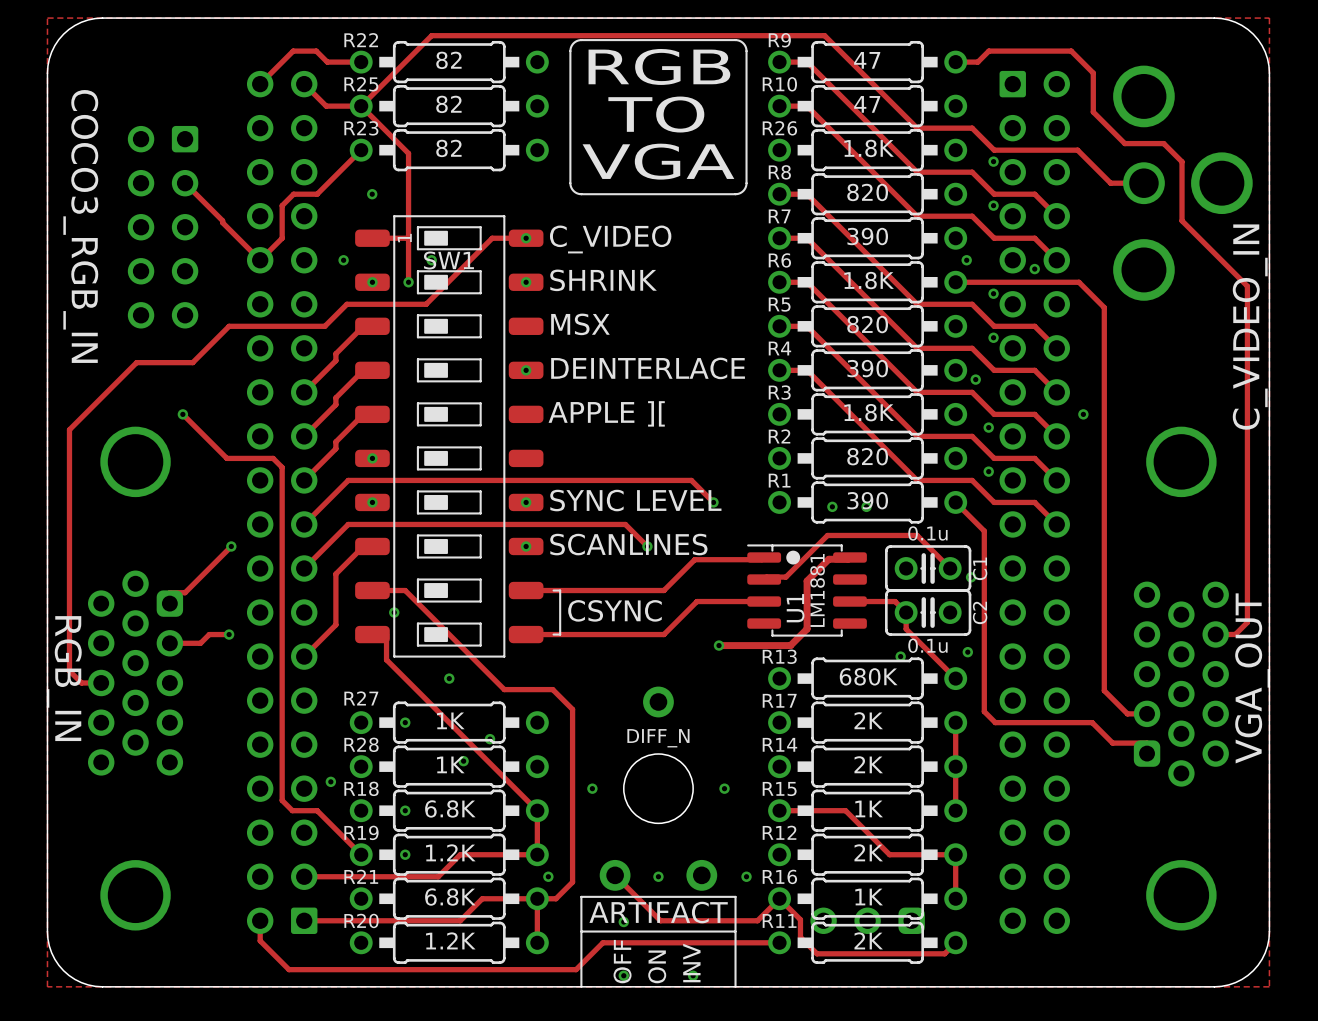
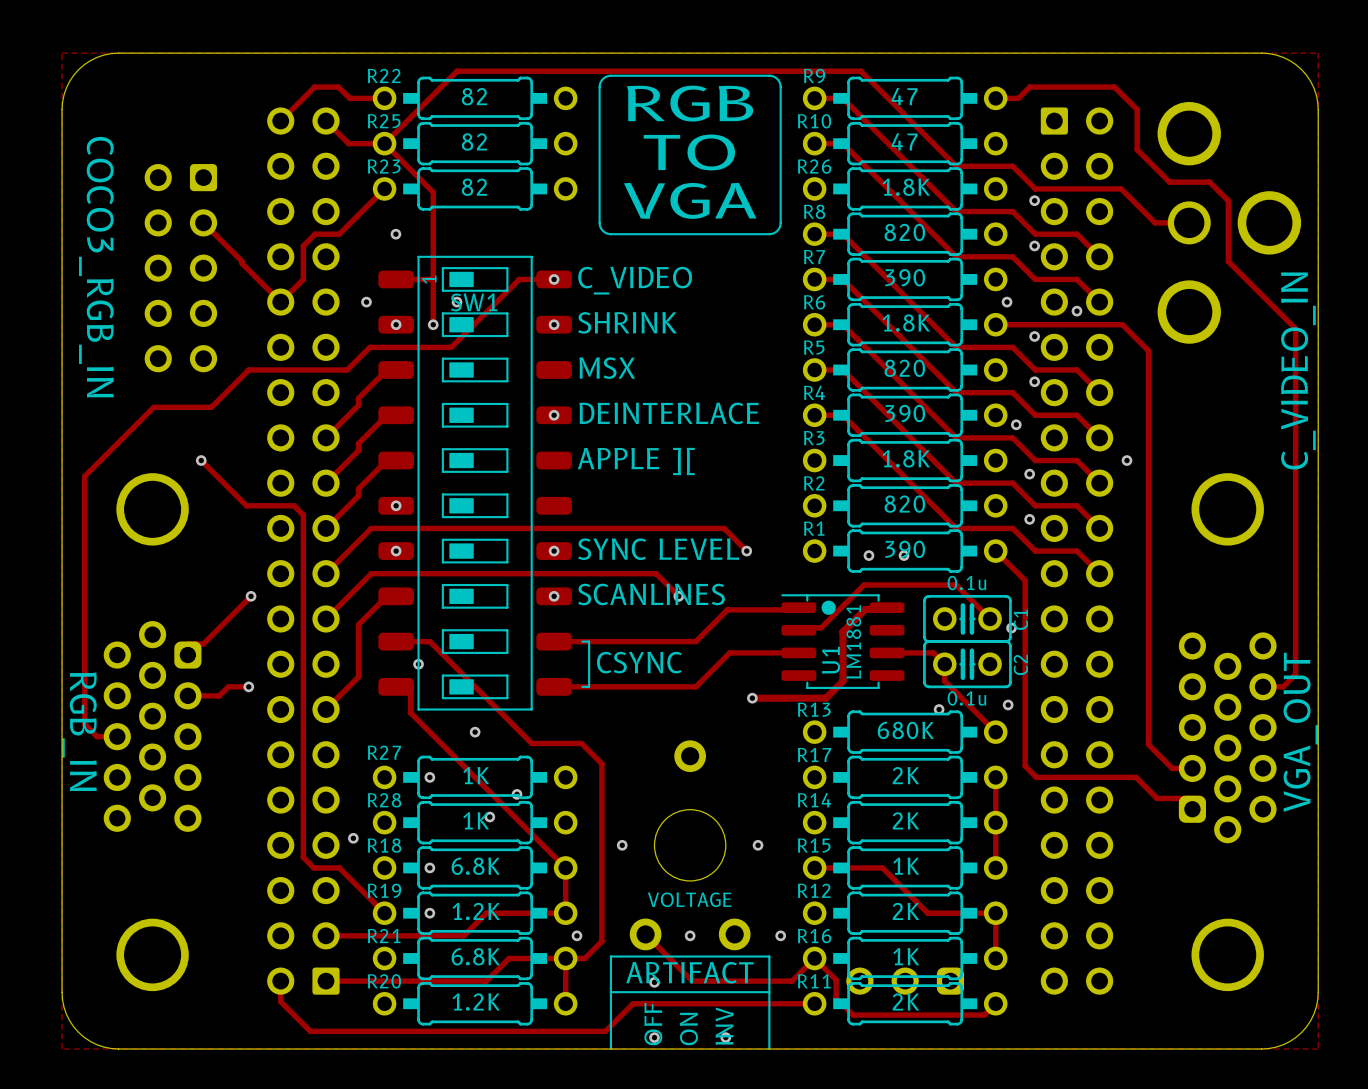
text: DIFF_N (658, 738) -> none
text: none -> VOLTAGE (689, 899)

